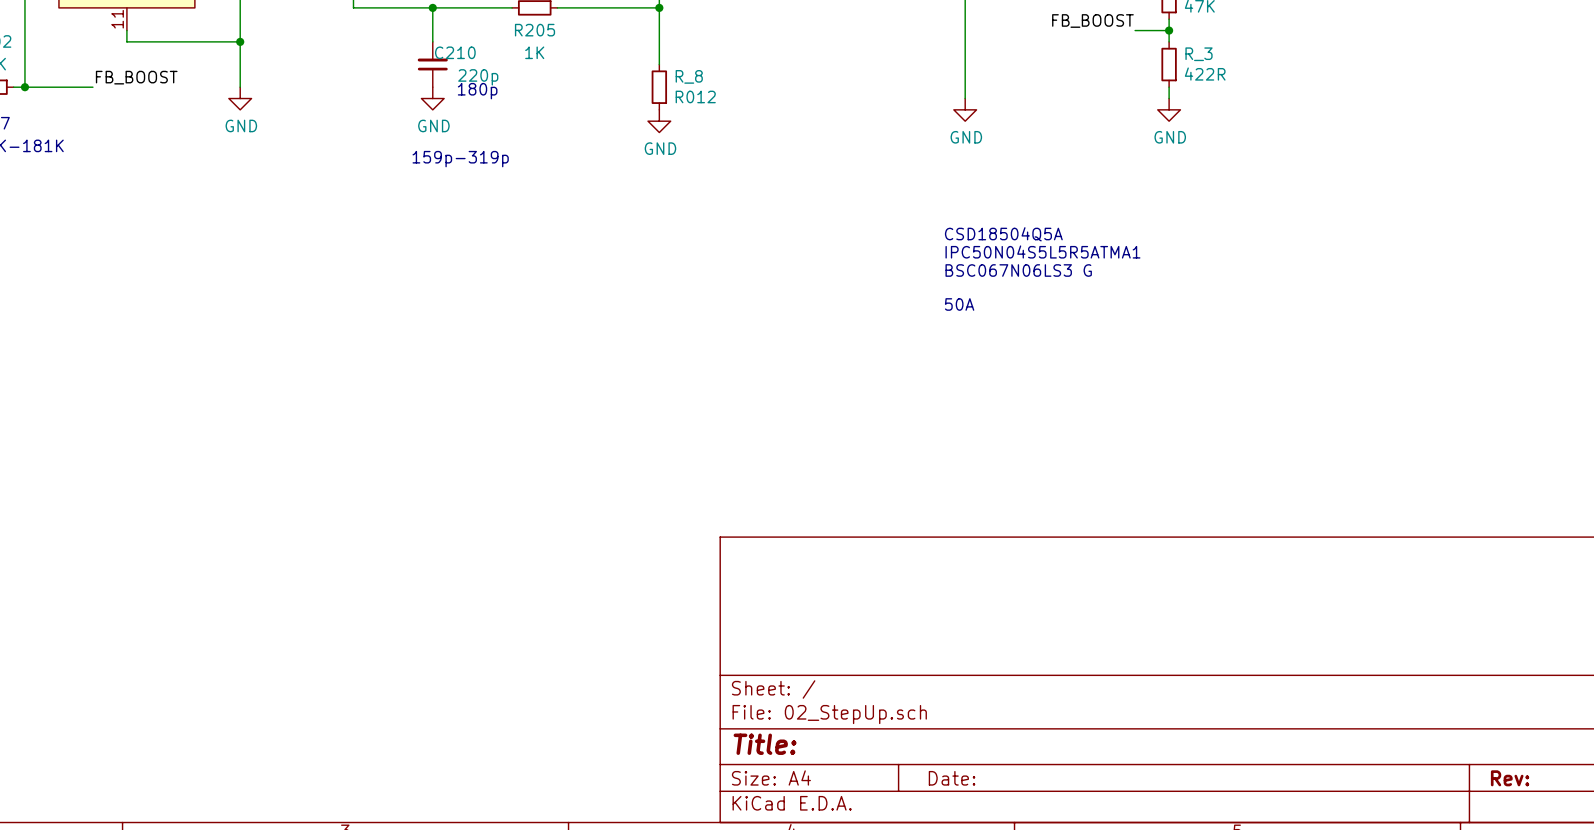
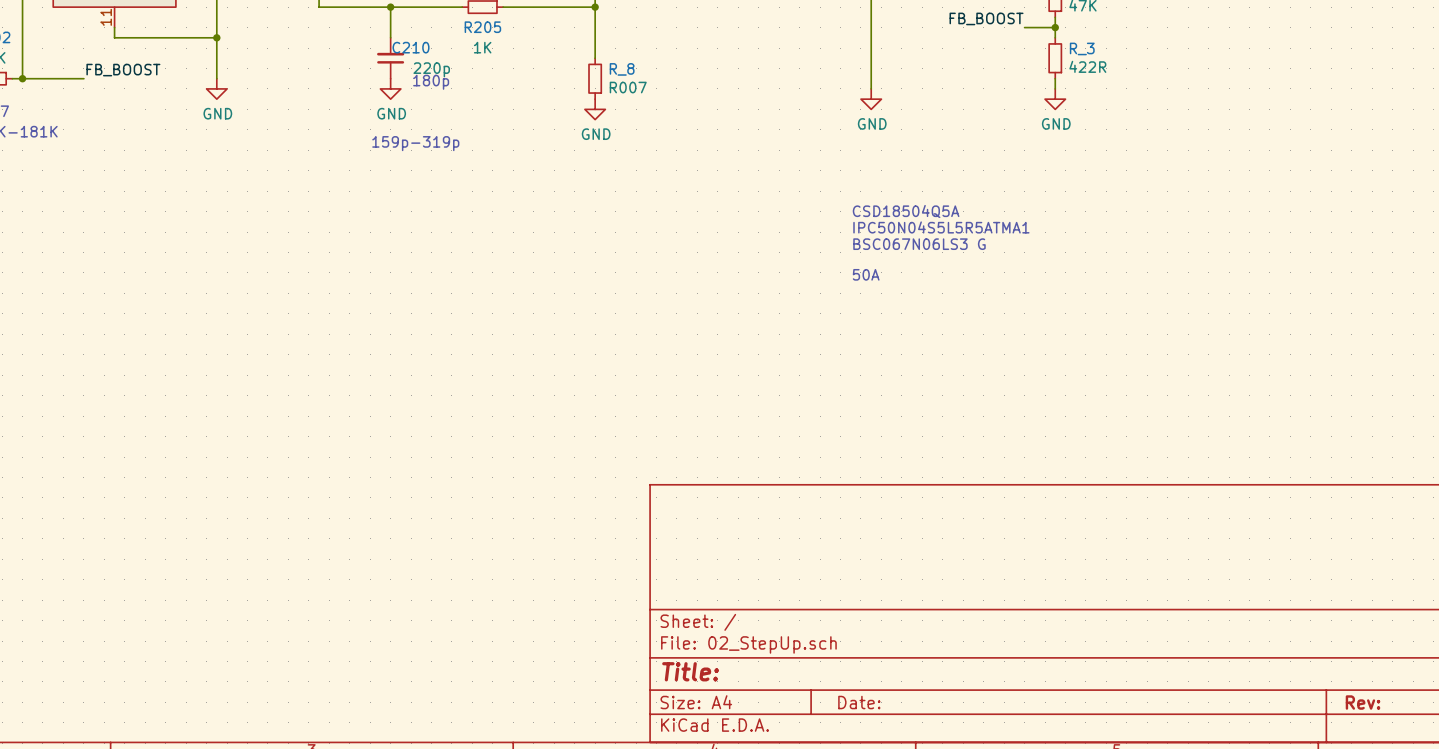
R_8 value: R012 (695, 96) -> R007 (628, 87)

